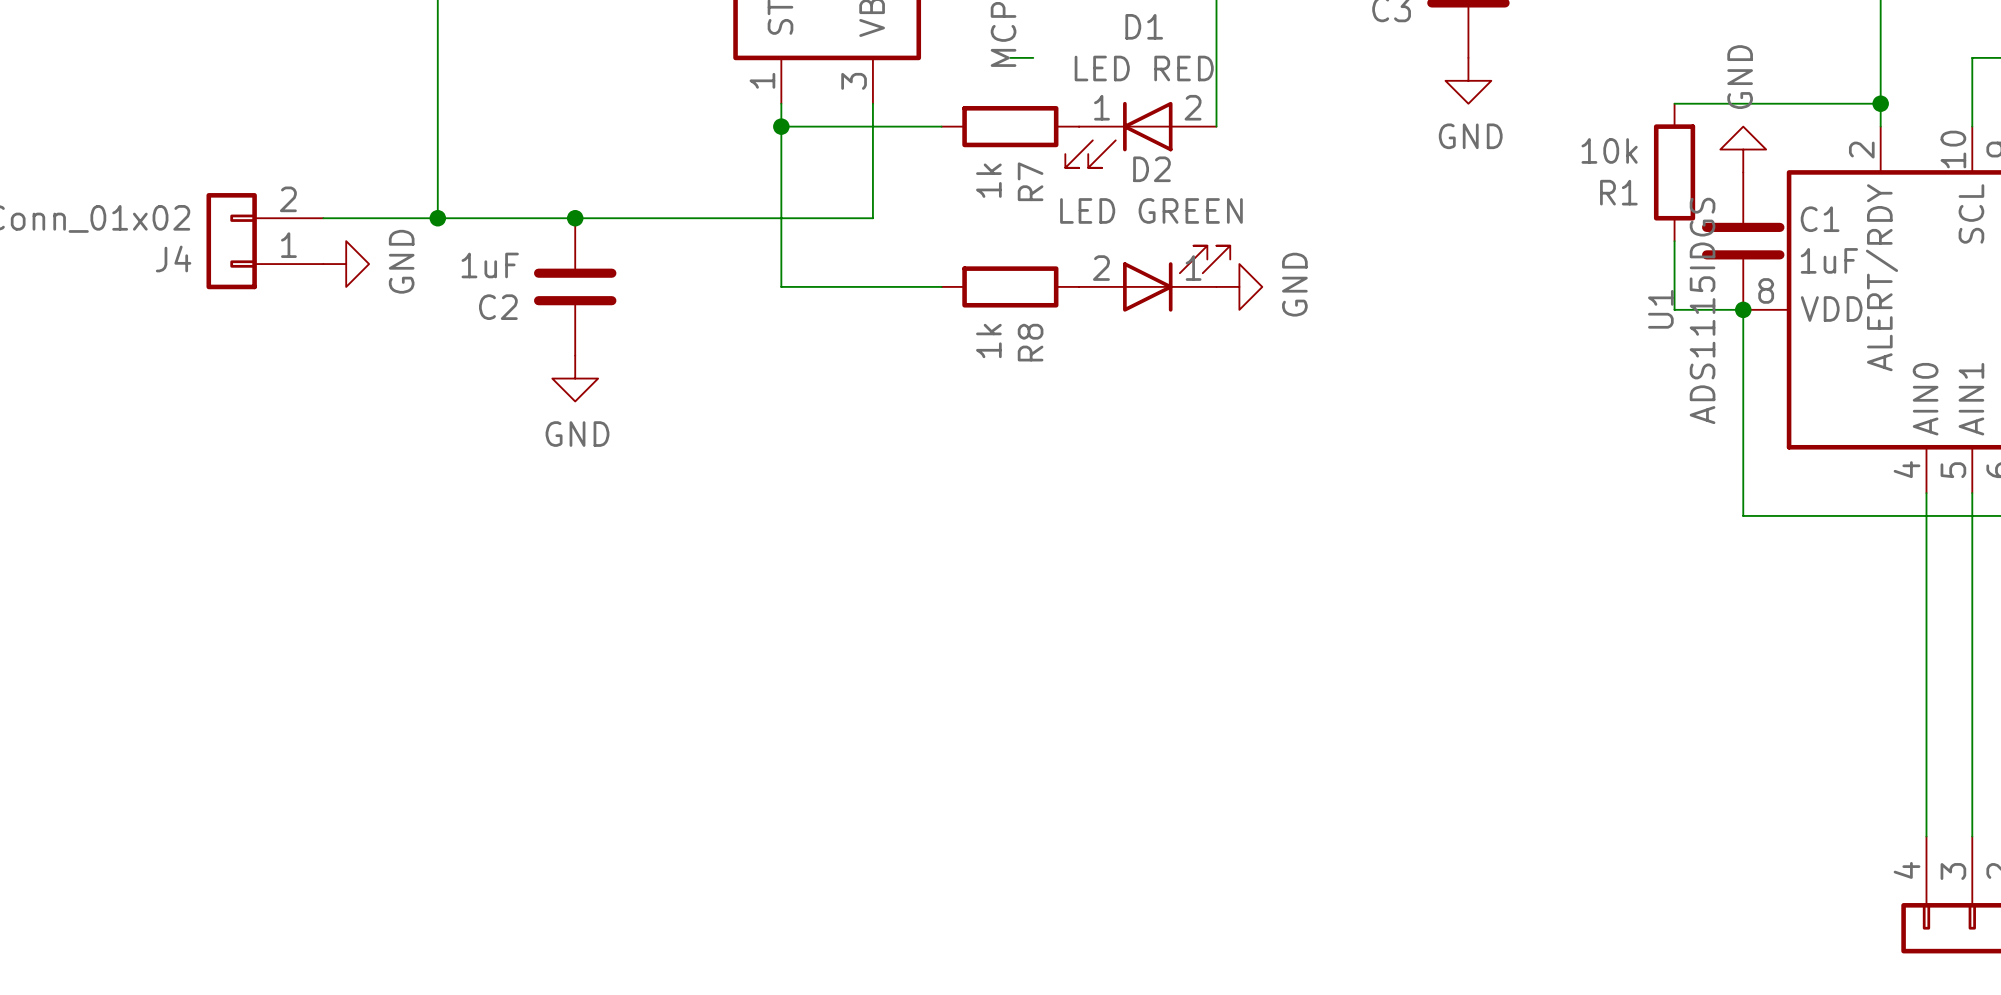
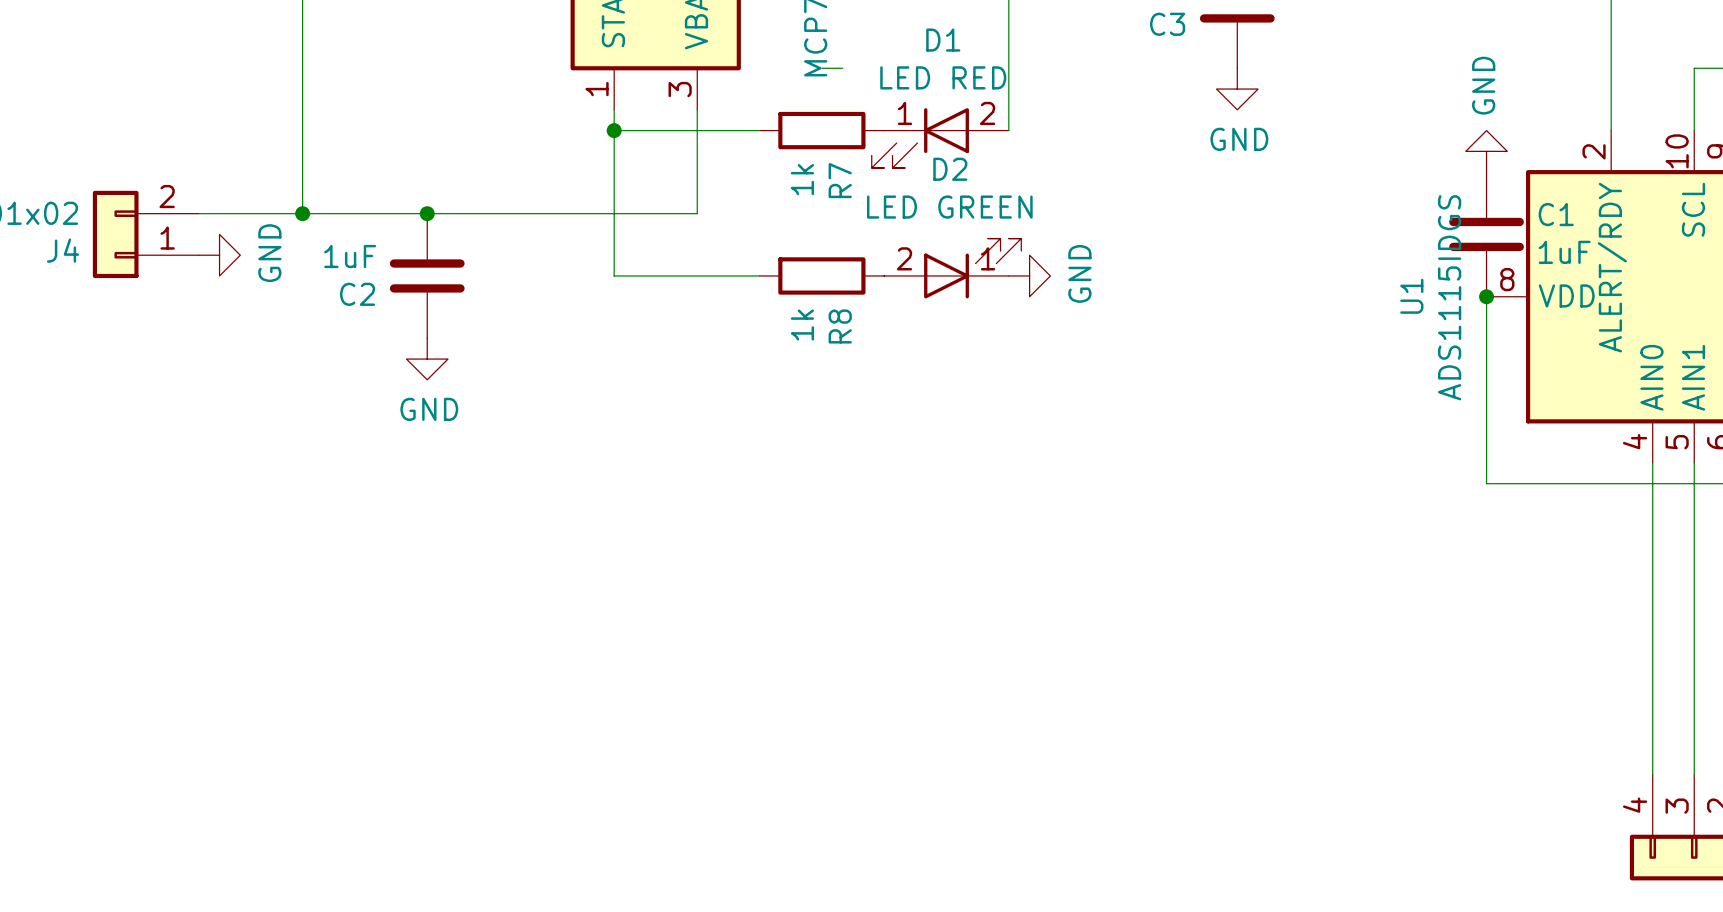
wire: (1674, 103) (1880, 103) -> none
junction: (1880, 103) -> none
R1: 10k (1674, 172) -> none
wire: (1674, 241) (1674, 309) (1743, 309) -> none

